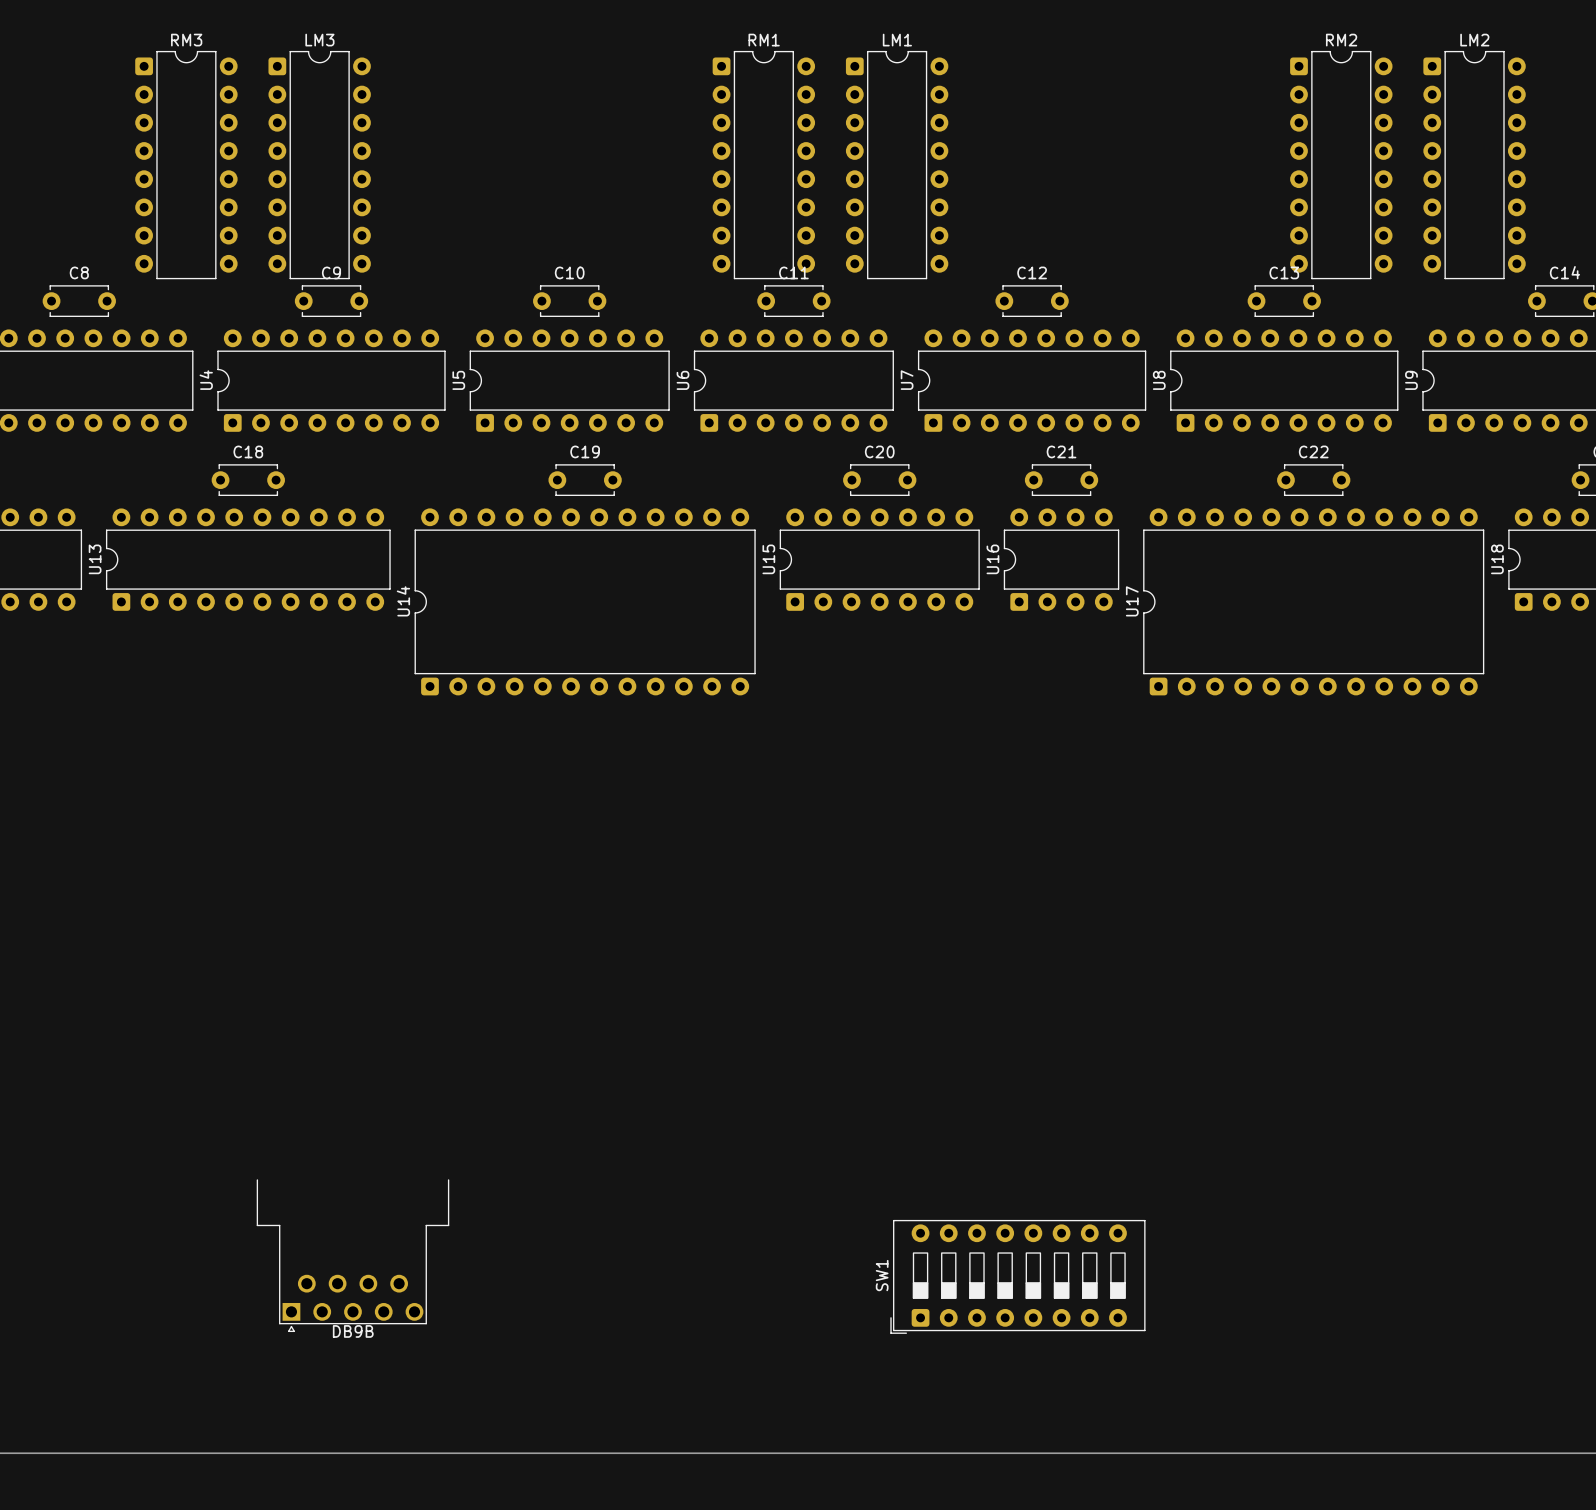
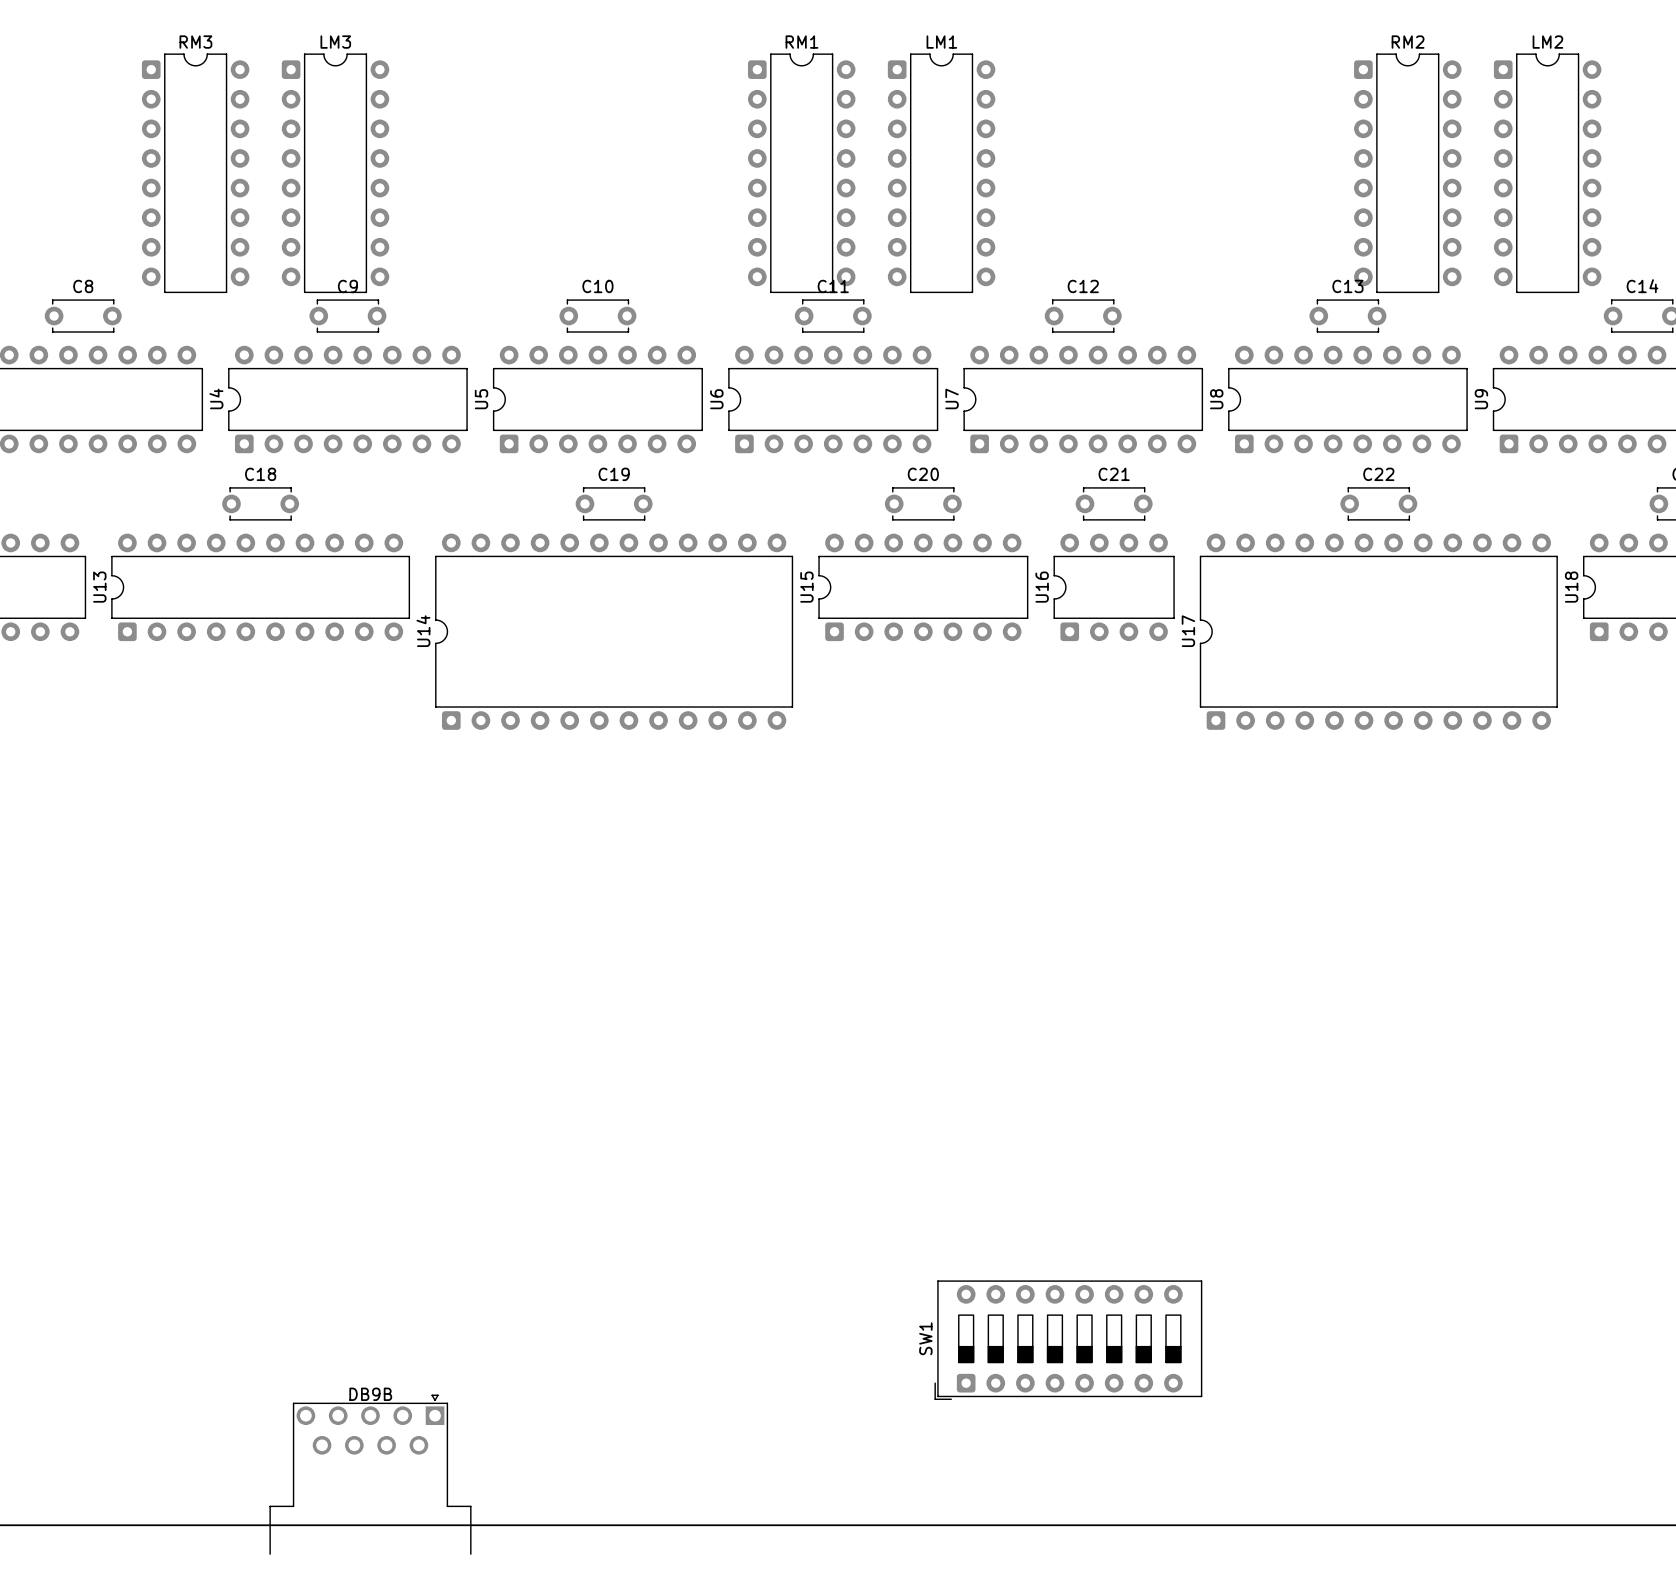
DB9B rotation: 0° (352, 1255) -> 180° (370, 1474)
DB9B position: (352, 1255) -> (370, 1474)

